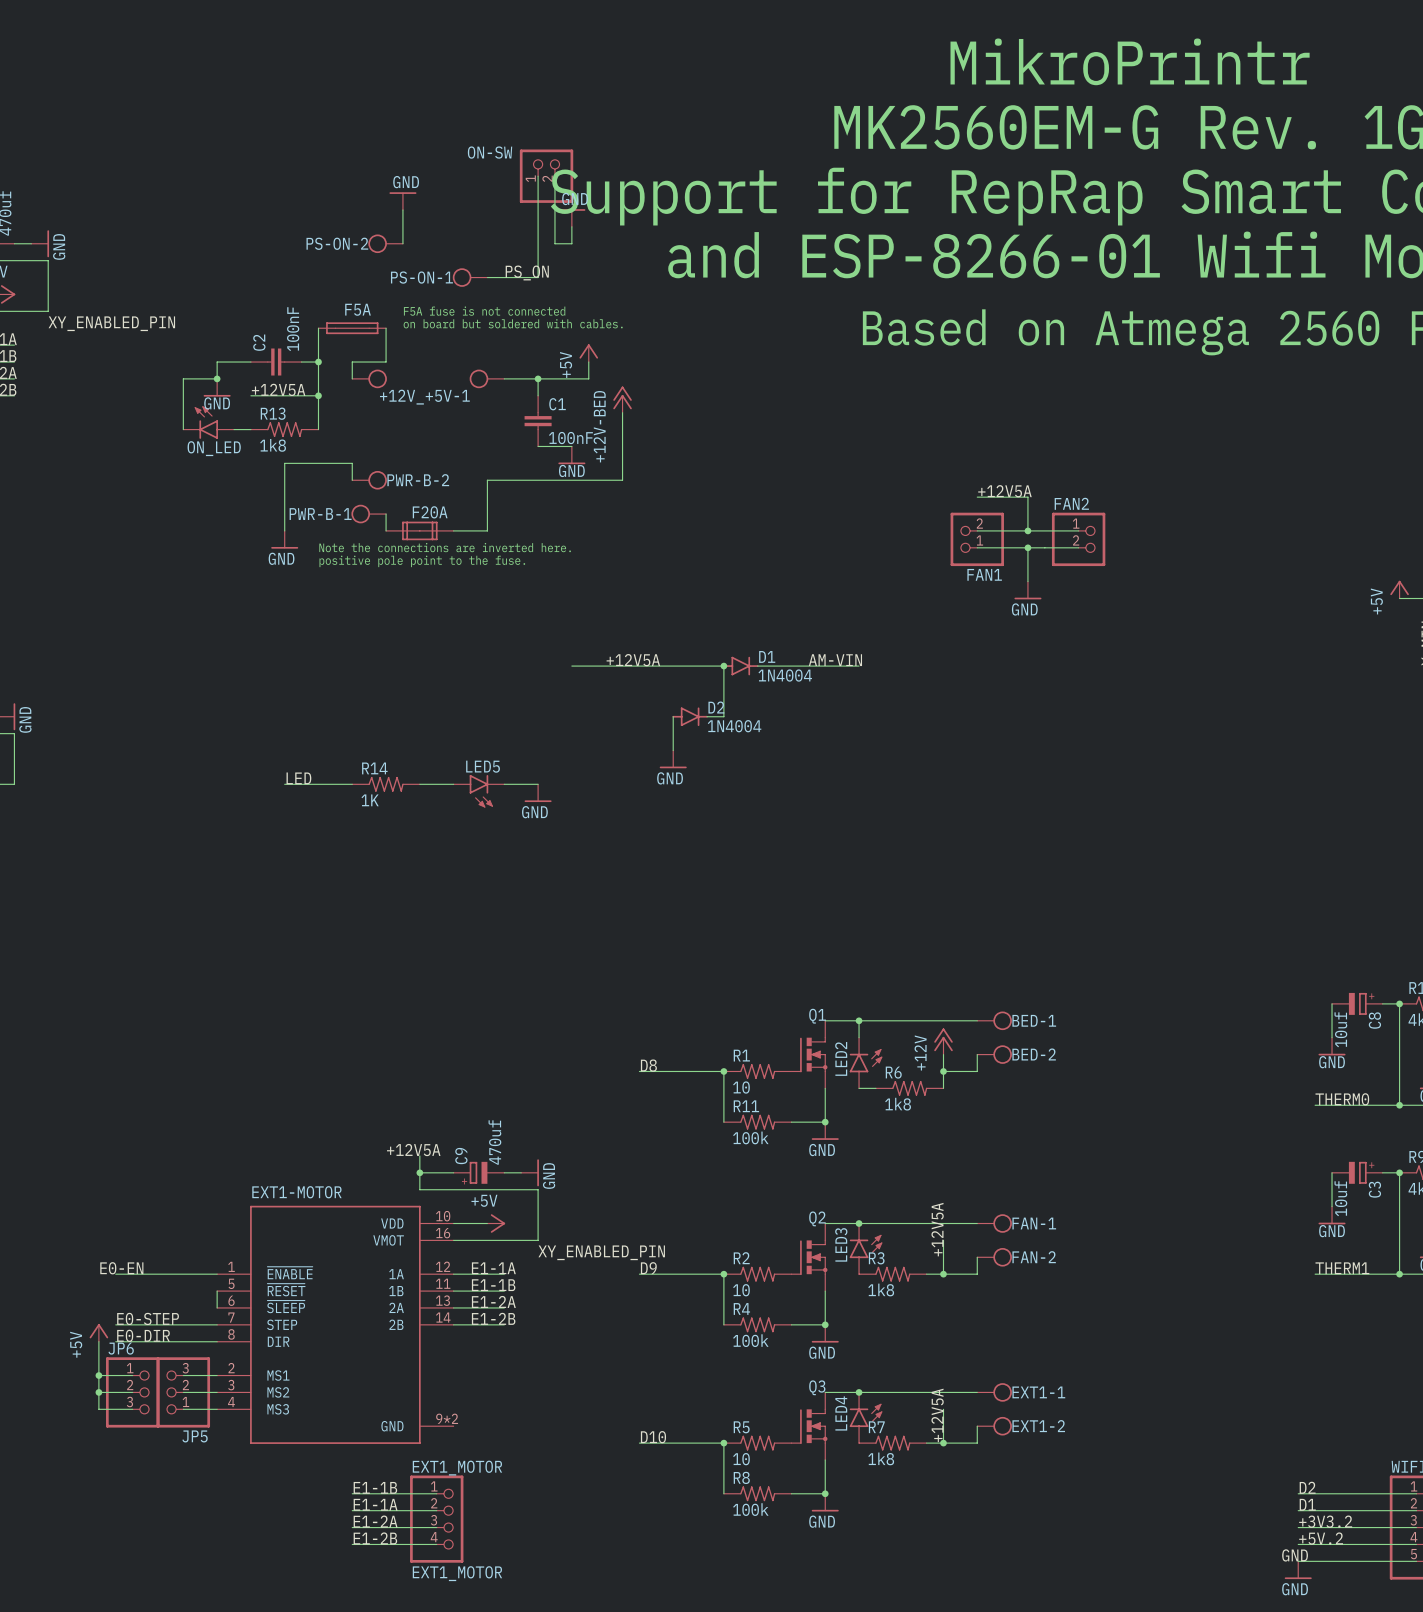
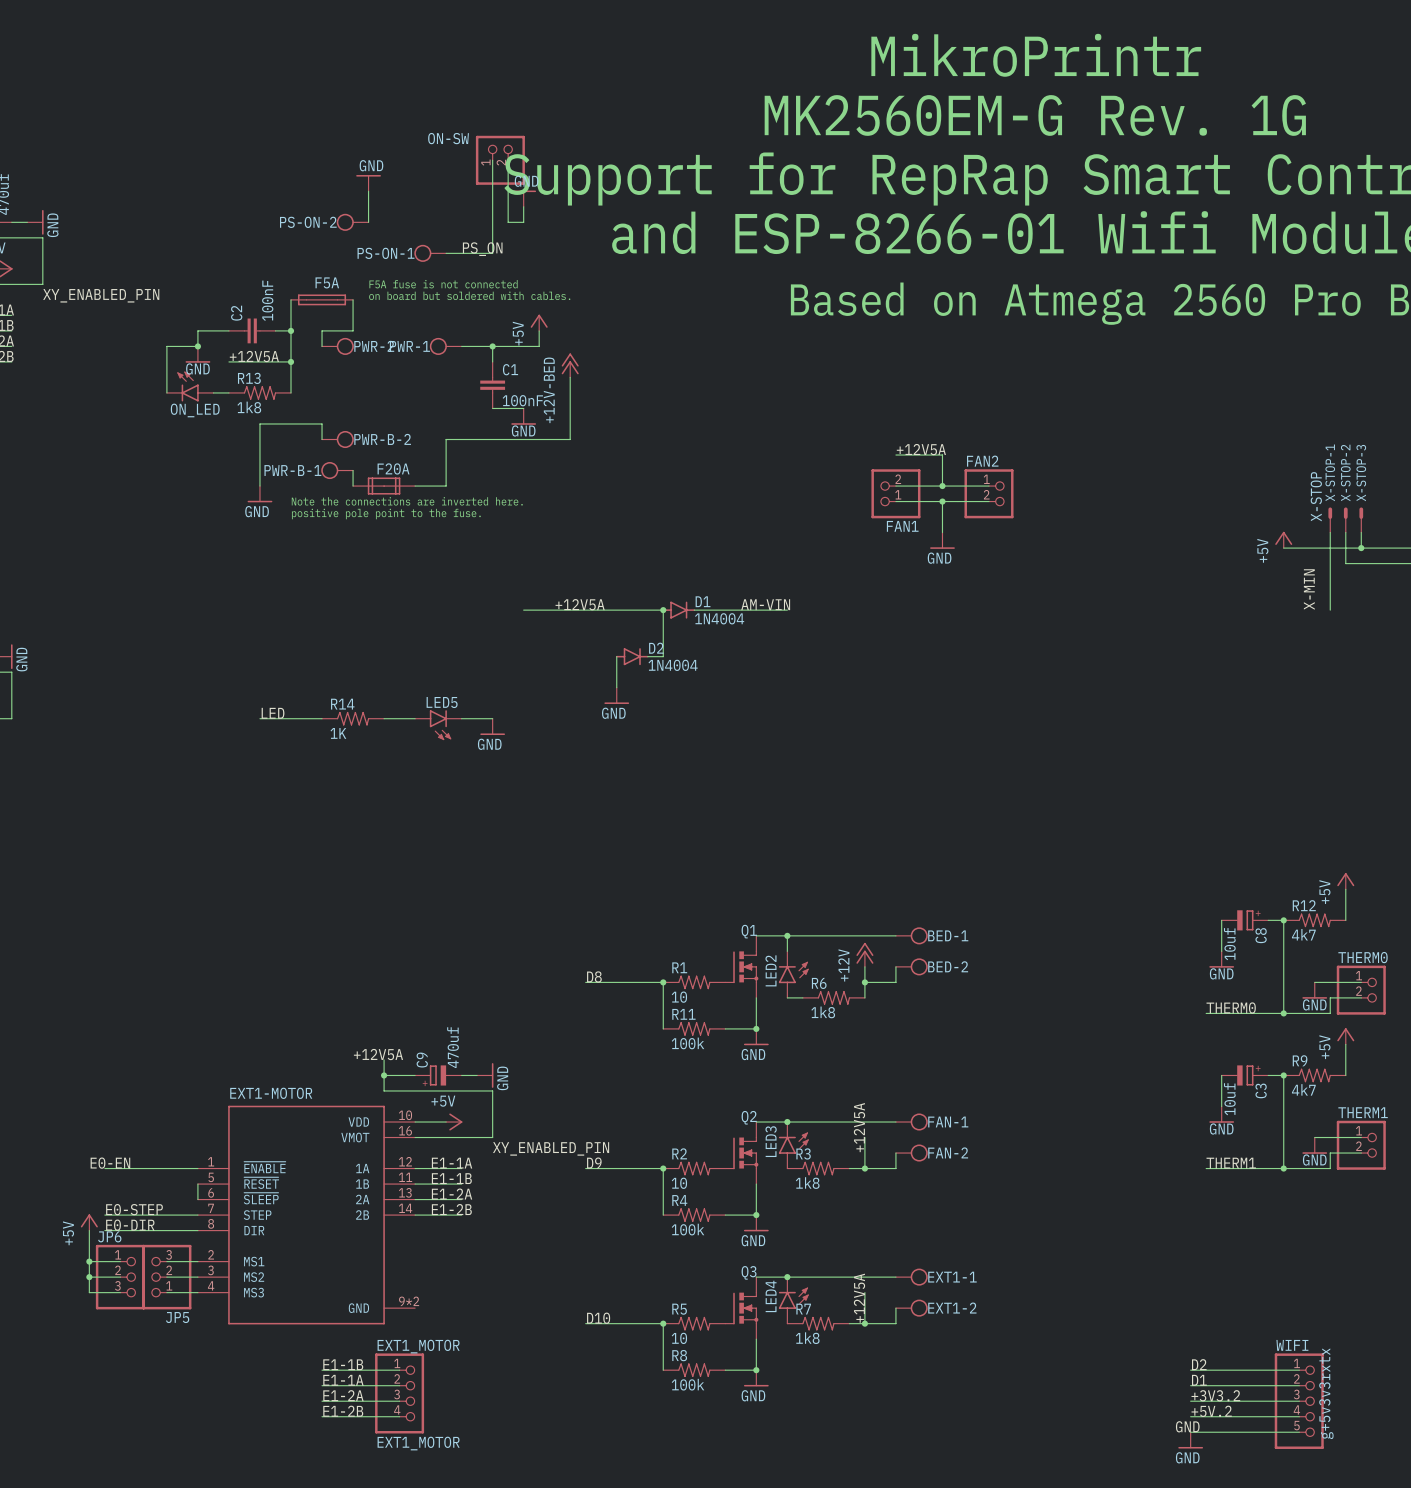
PWR-2 name: none -> PWR-2 (374, 346)
+12V_+5V-1 name: +12V_+5V-1 (424, 397) -> PWR-1 (409, 346)

